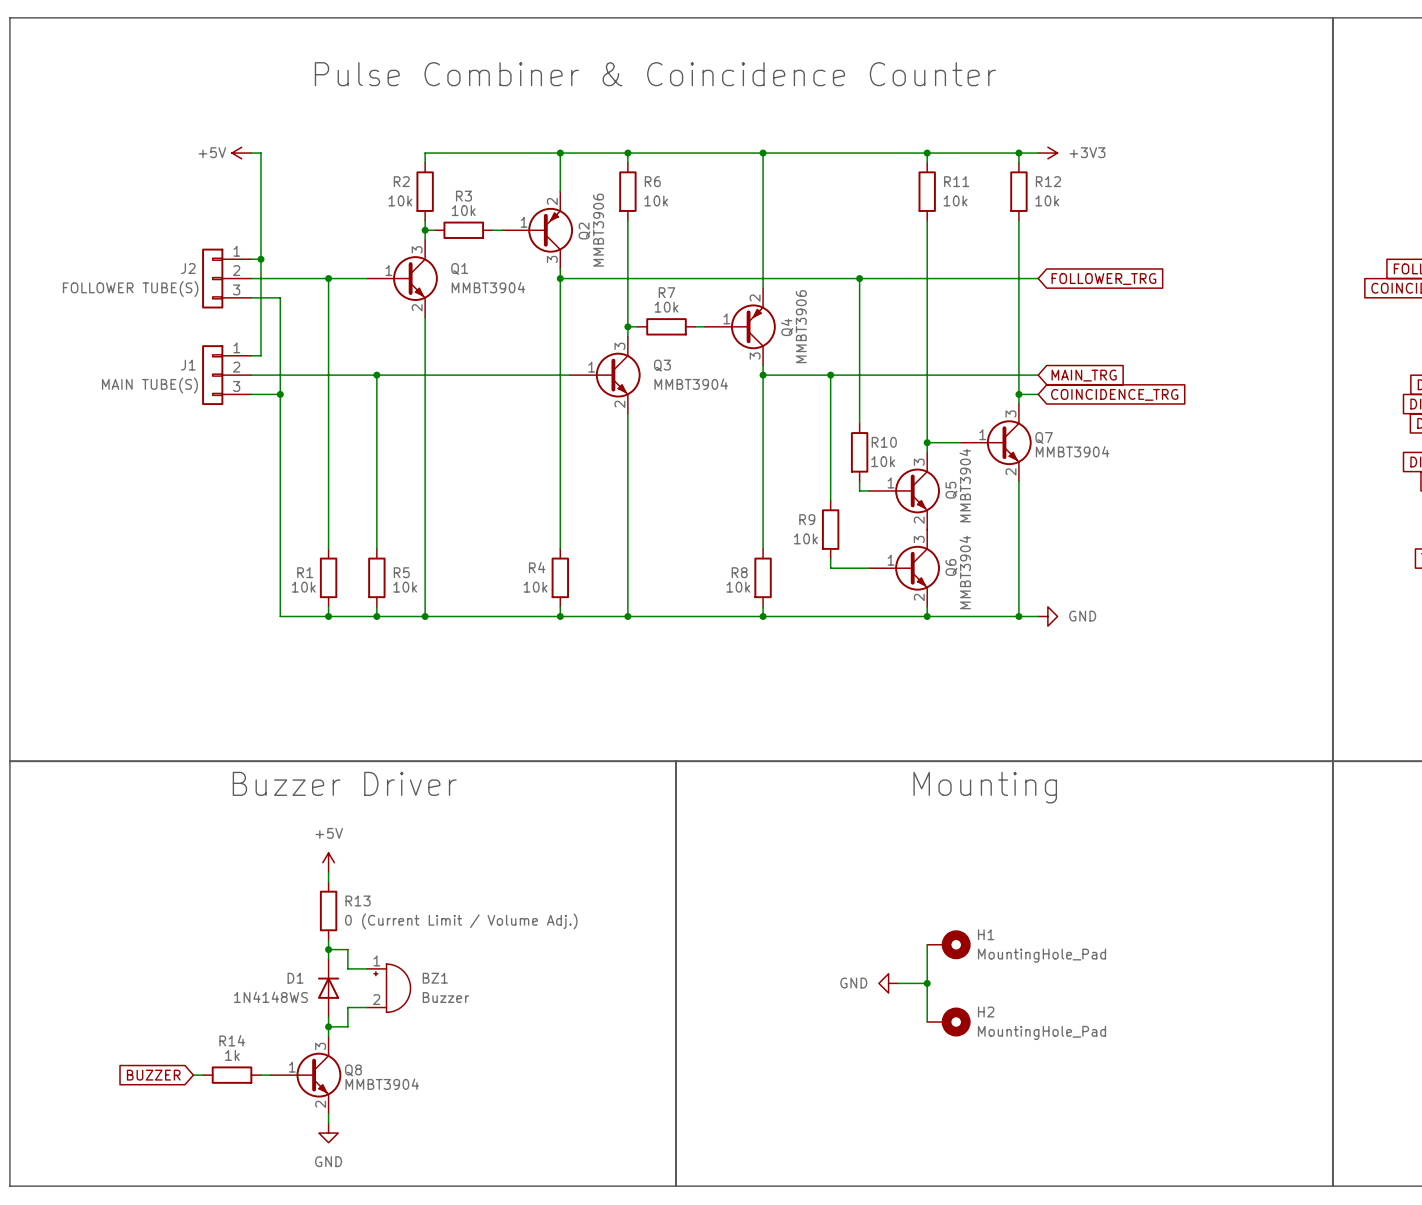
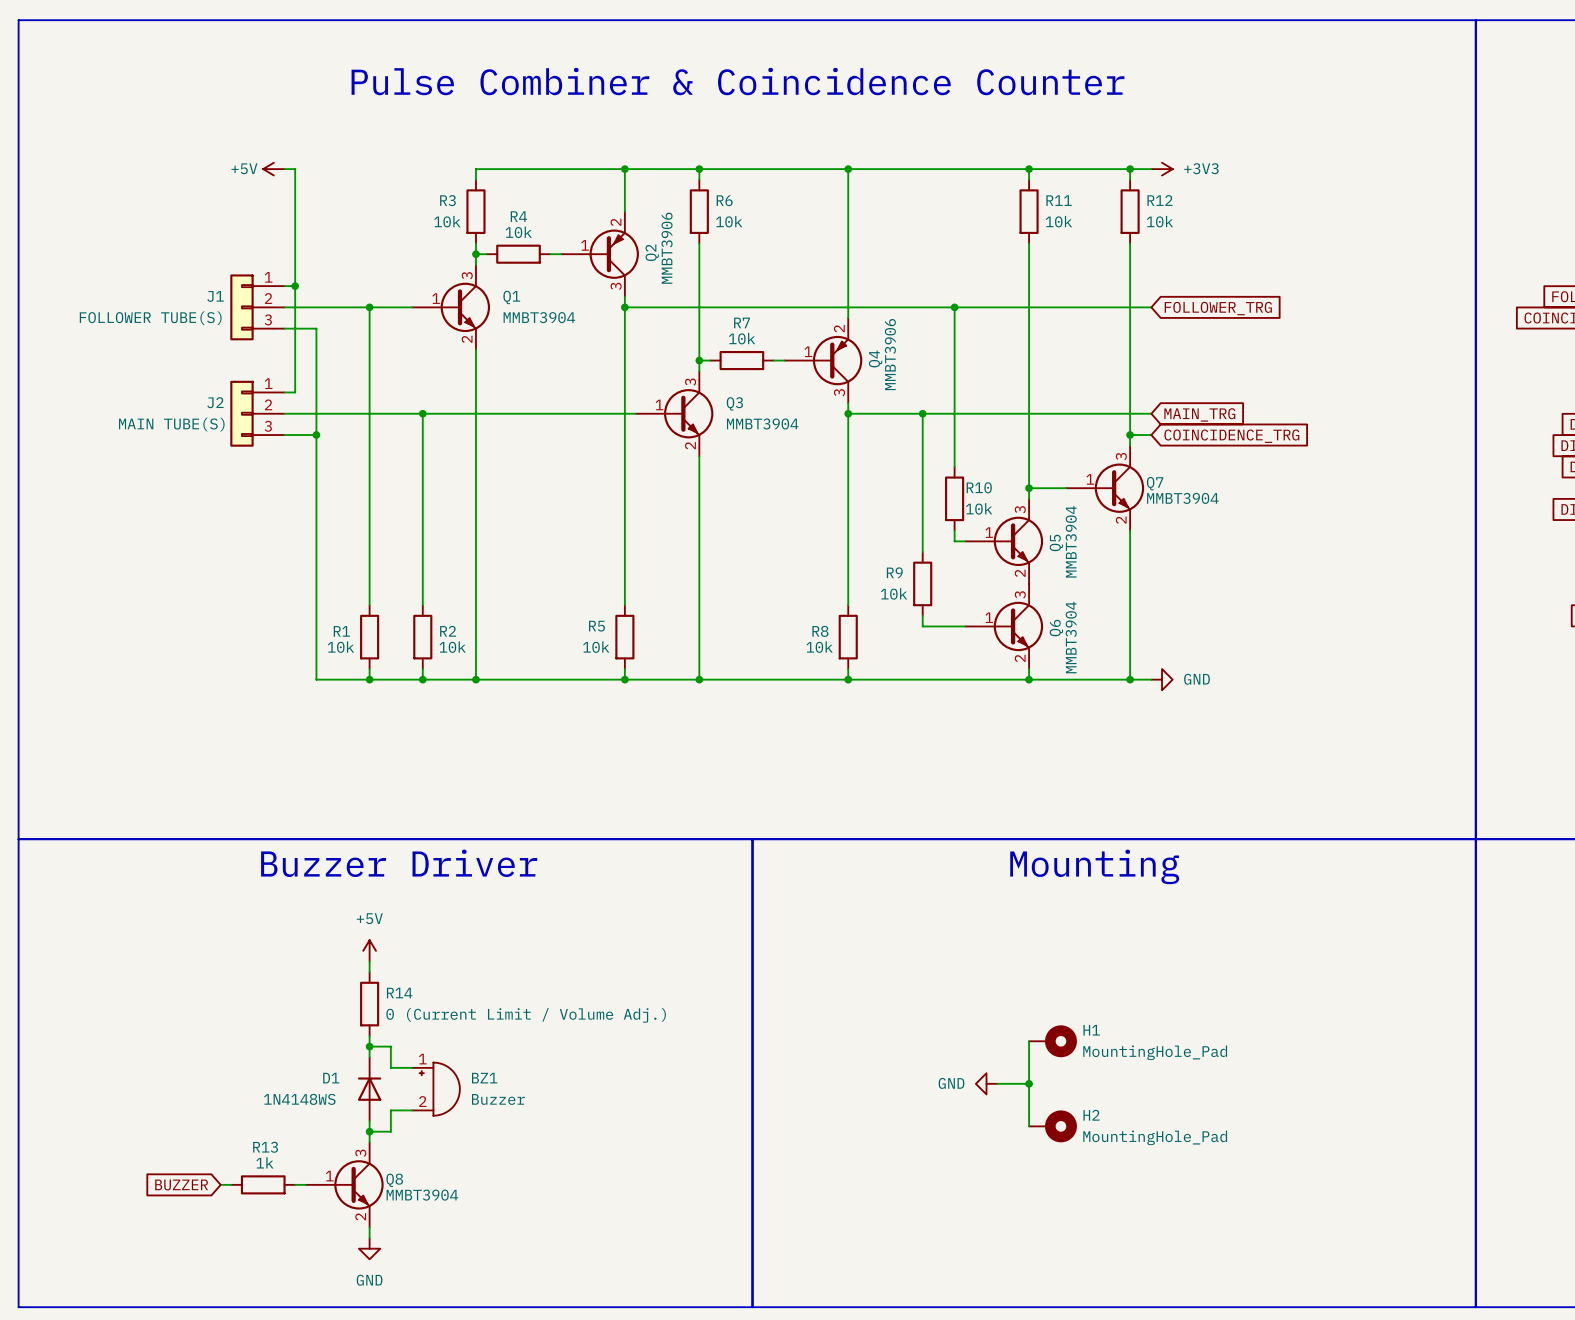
R2 name: R2 (401, 181) -> R3 (447, 200)
R3 name: R3 (463, 196) -> R4 (518, 216)
J2 name: J2 (188, 268) -> J1 (215, 296)
J1 name: J1 (188, 365) -> J2 (215, 402)
R4 name: R4 (537, 567) -> R5 (596, 626)
R5 name: R5 (401, 572) -> R2 (448, 631)
R13 name: R13 (358, 900) -> R14 (399, 993)
R14 name: R14 (232, 1040) -> R13 (265, 1147)

